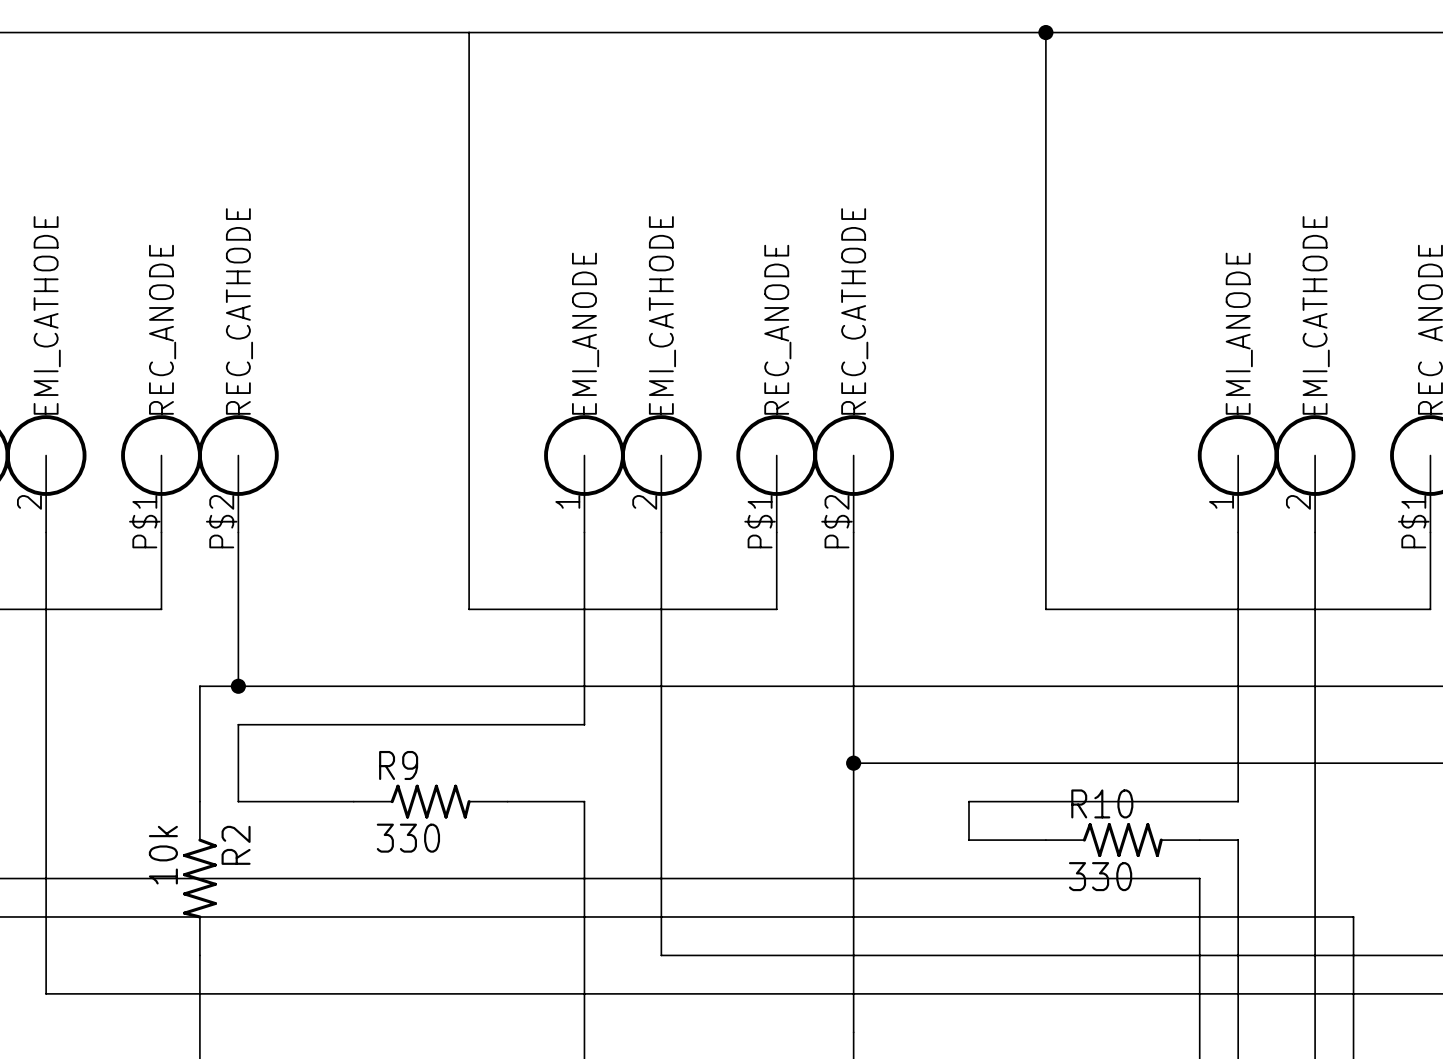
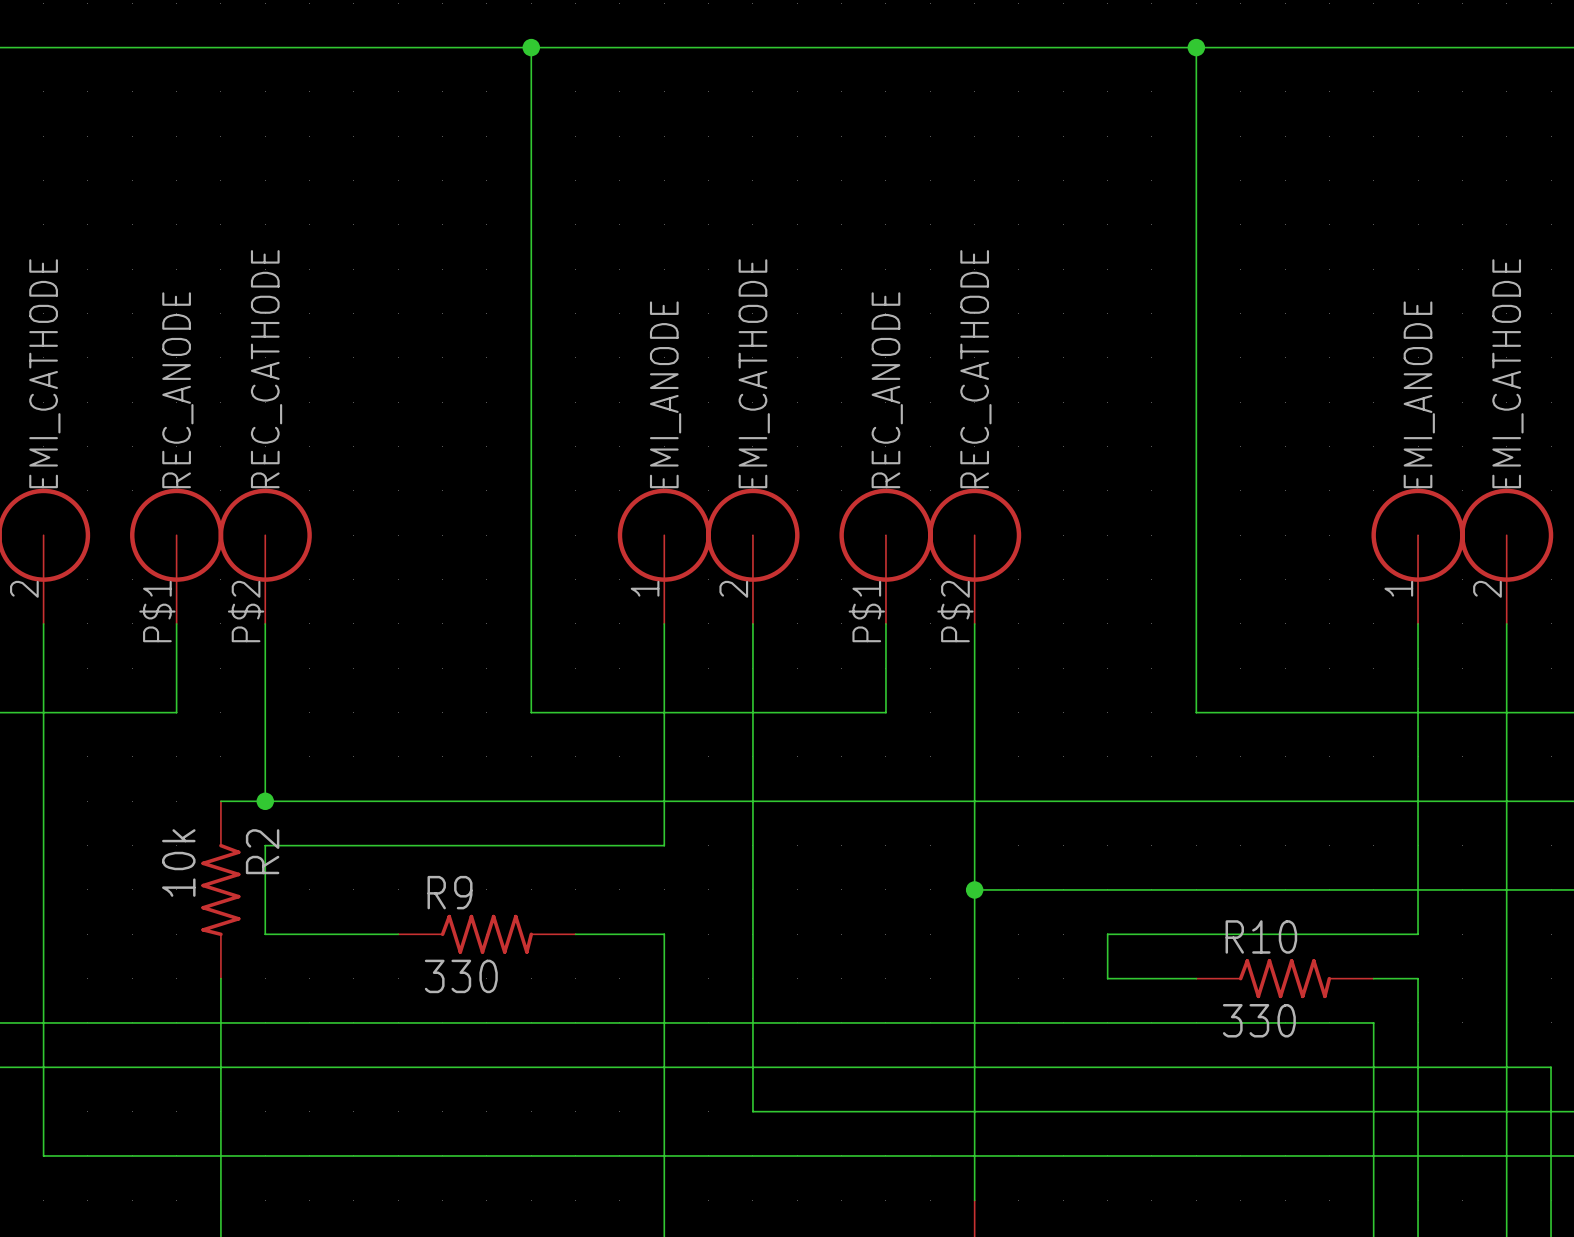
junction: none -> (531, 47)
R2 position: (199, 878) -> (220, 889)

